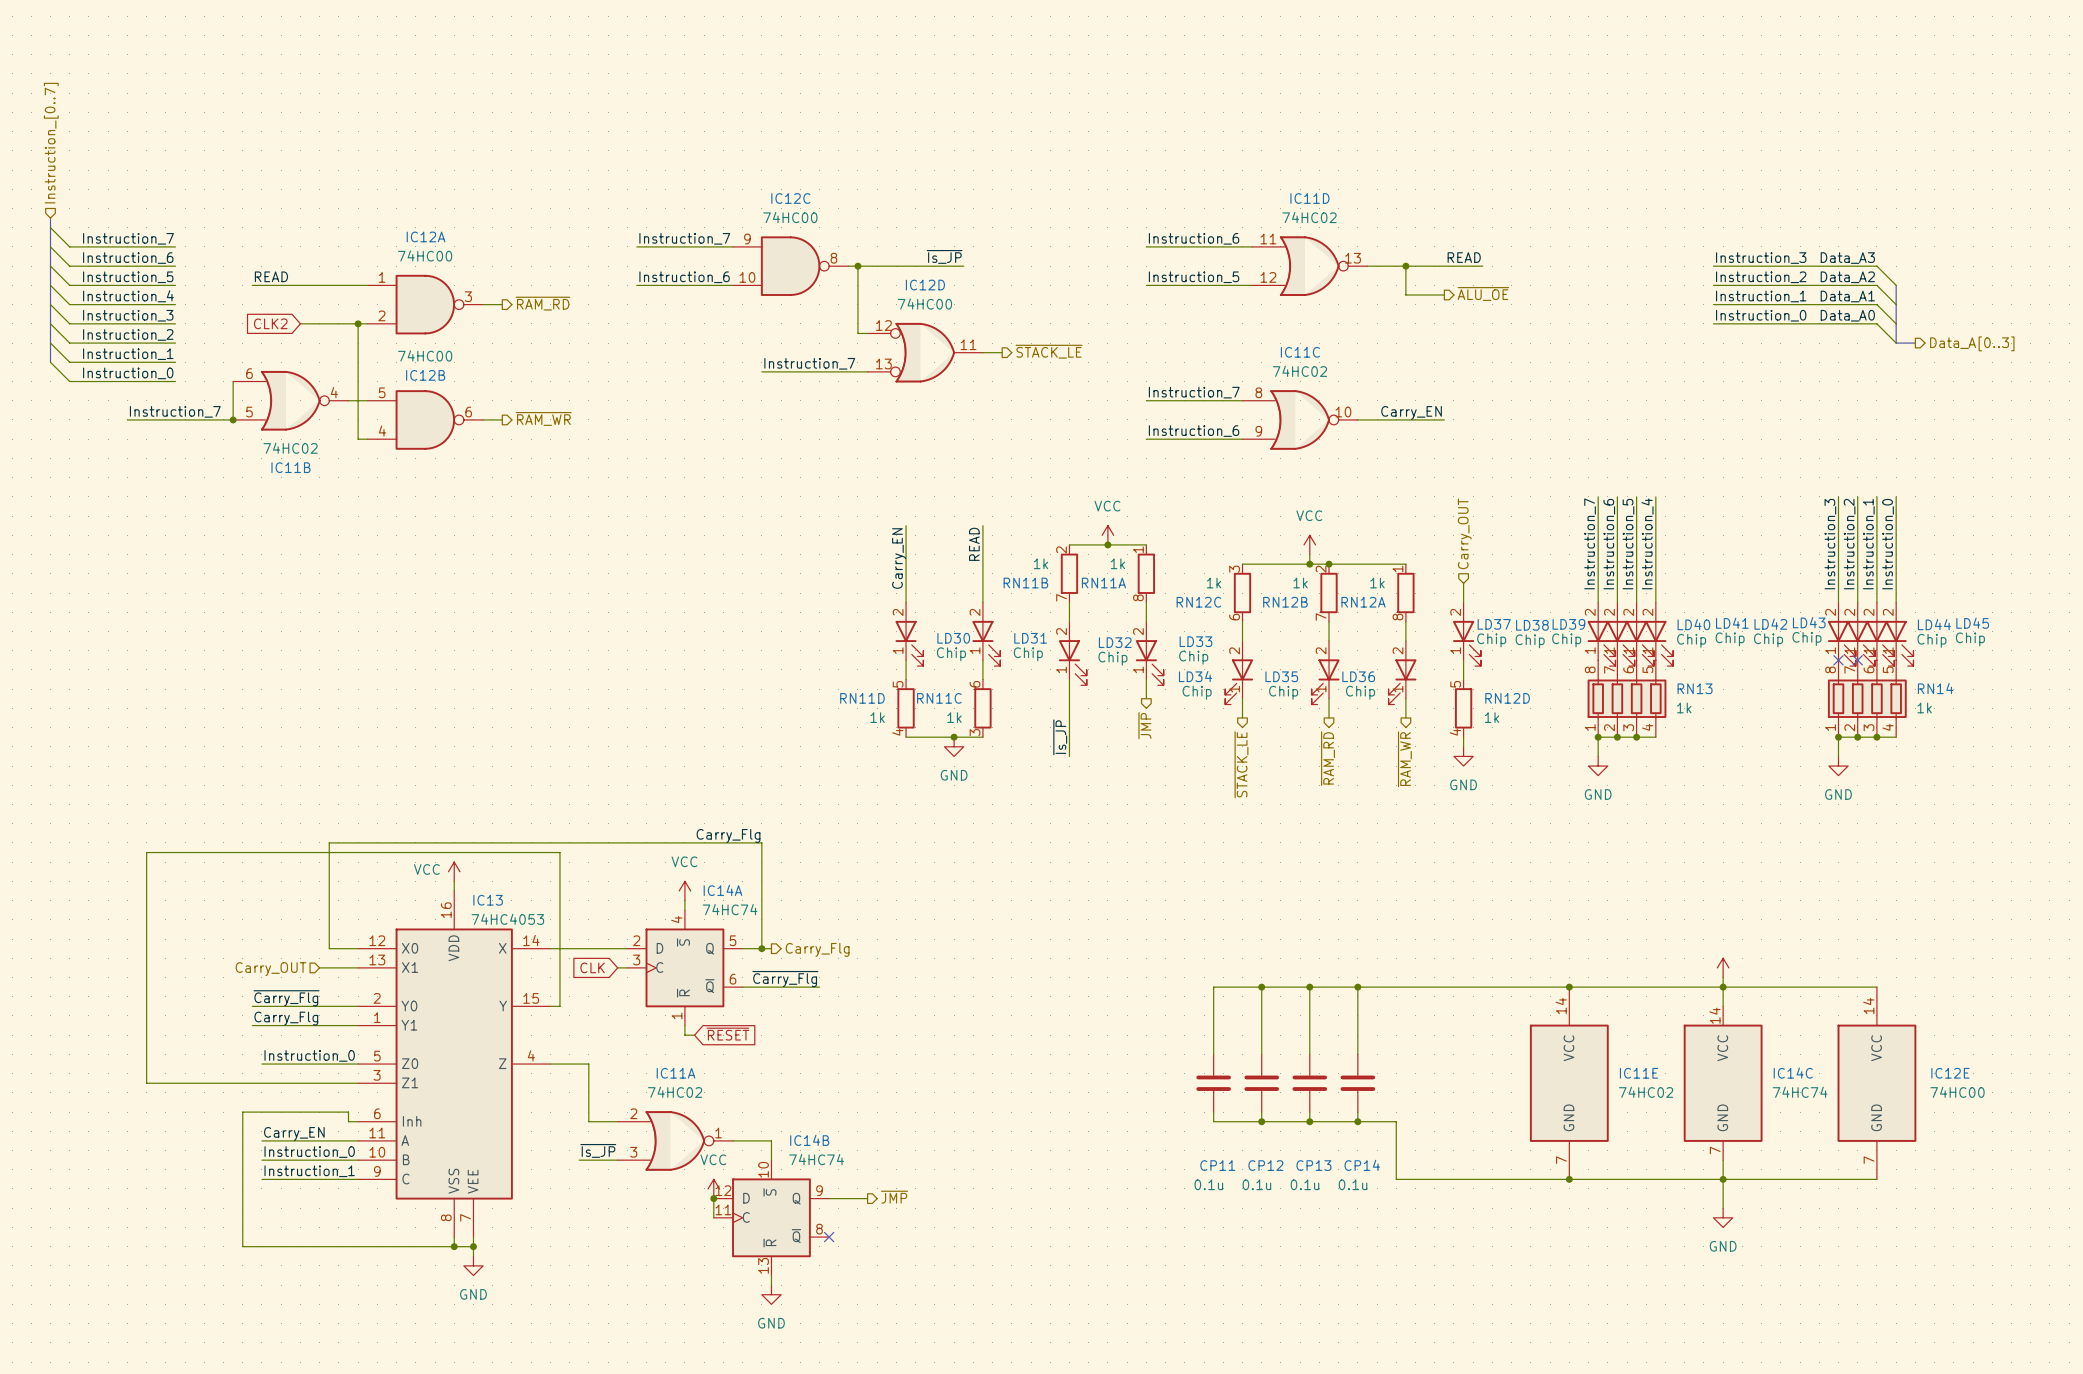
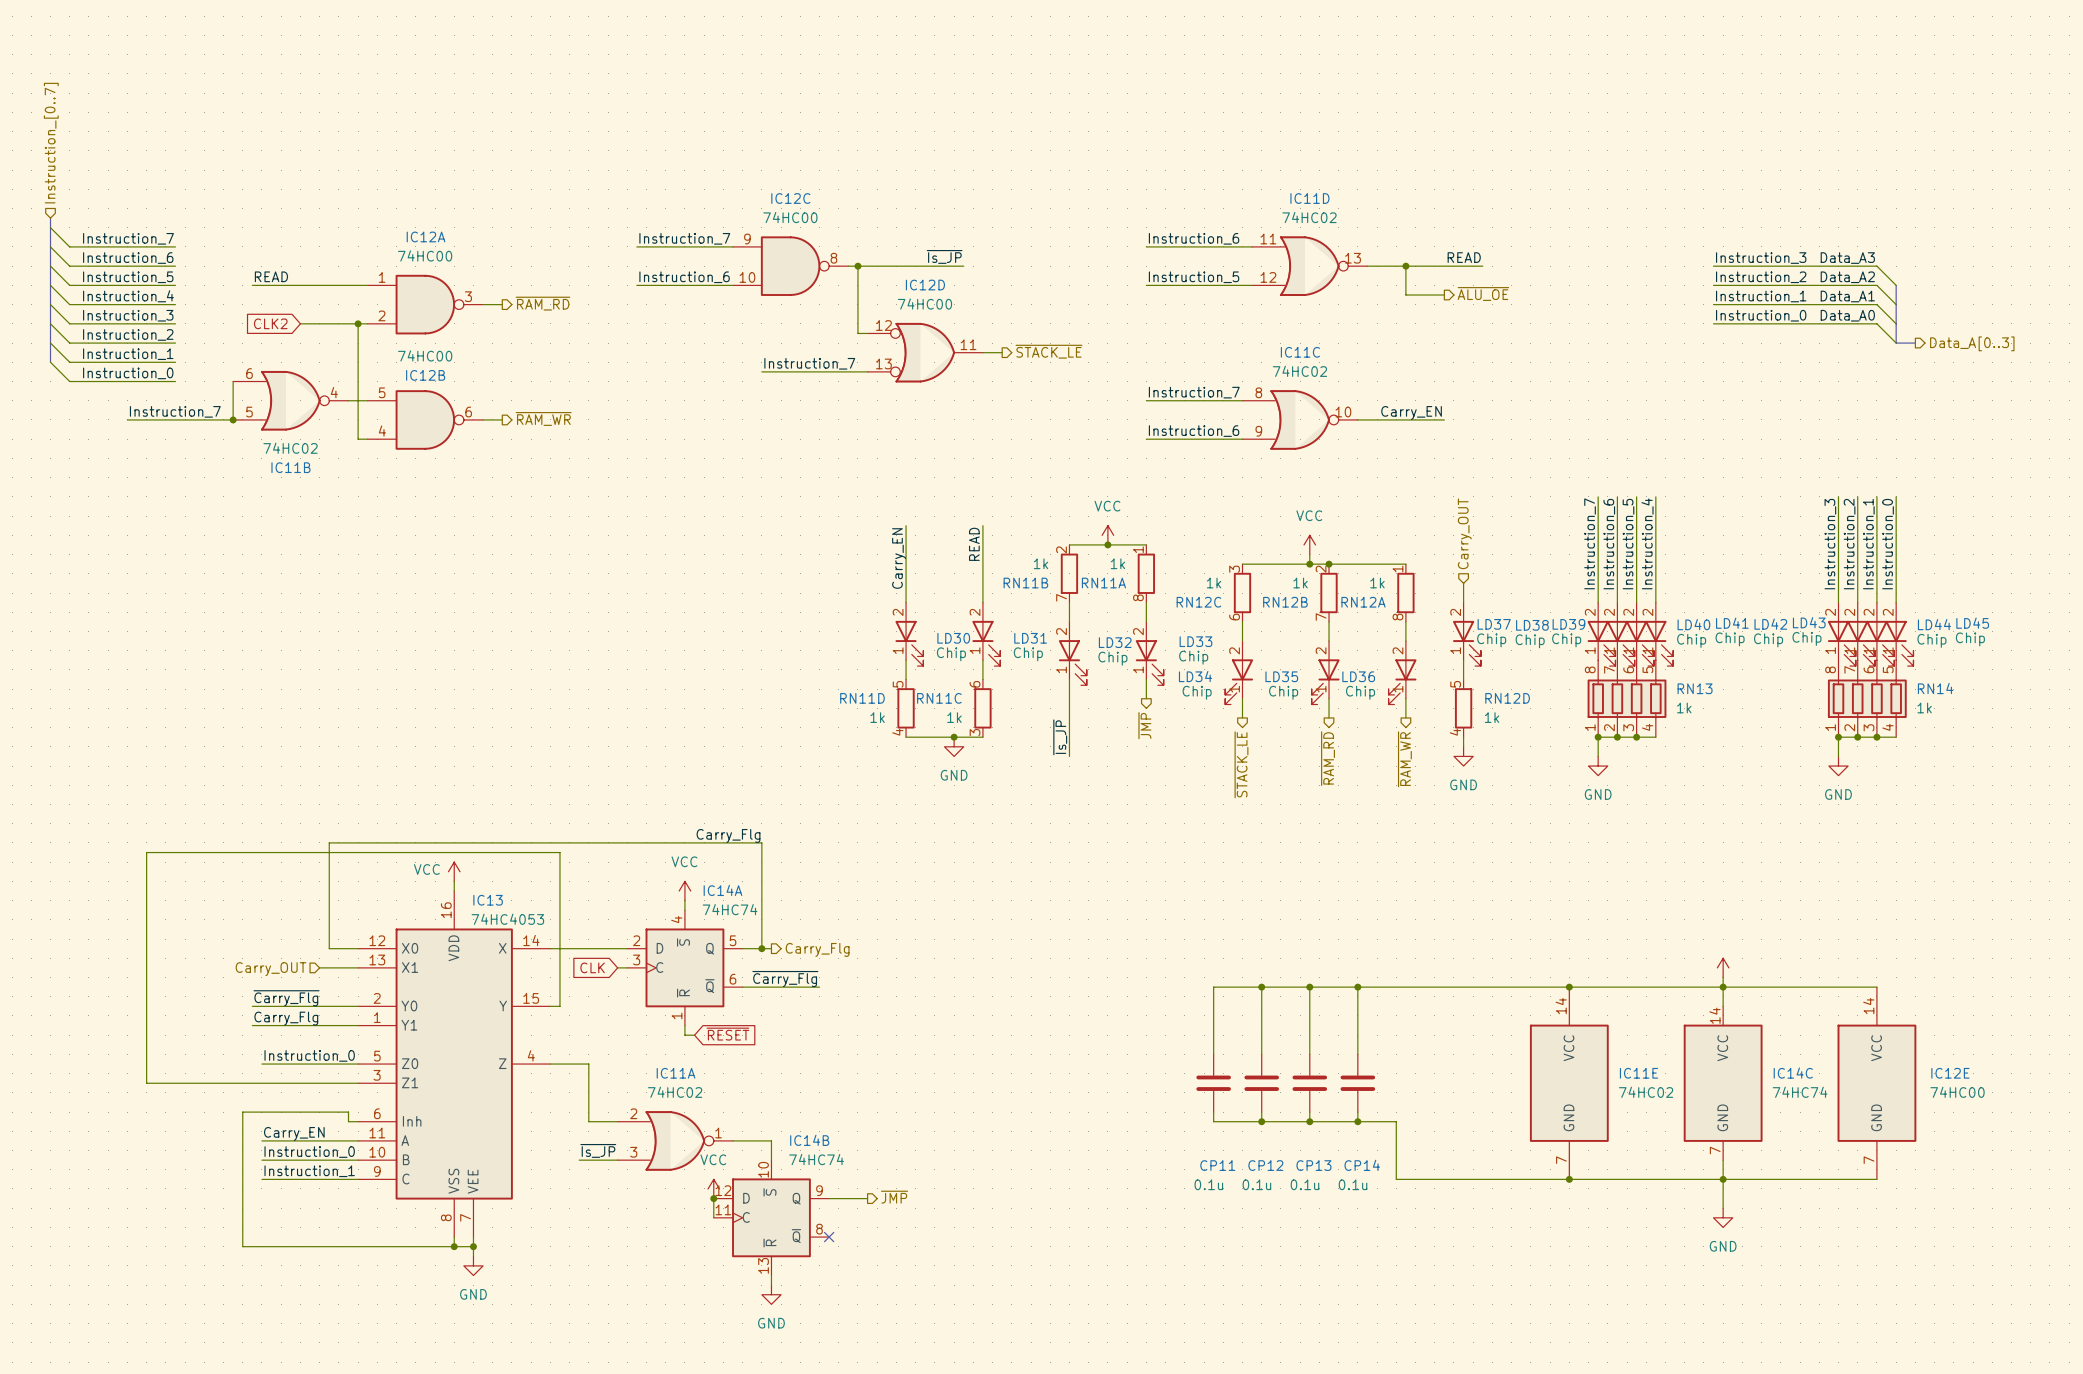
no-connect mark: (1838, 660) -> none
no-connect mark: (1857, 660) -> none

